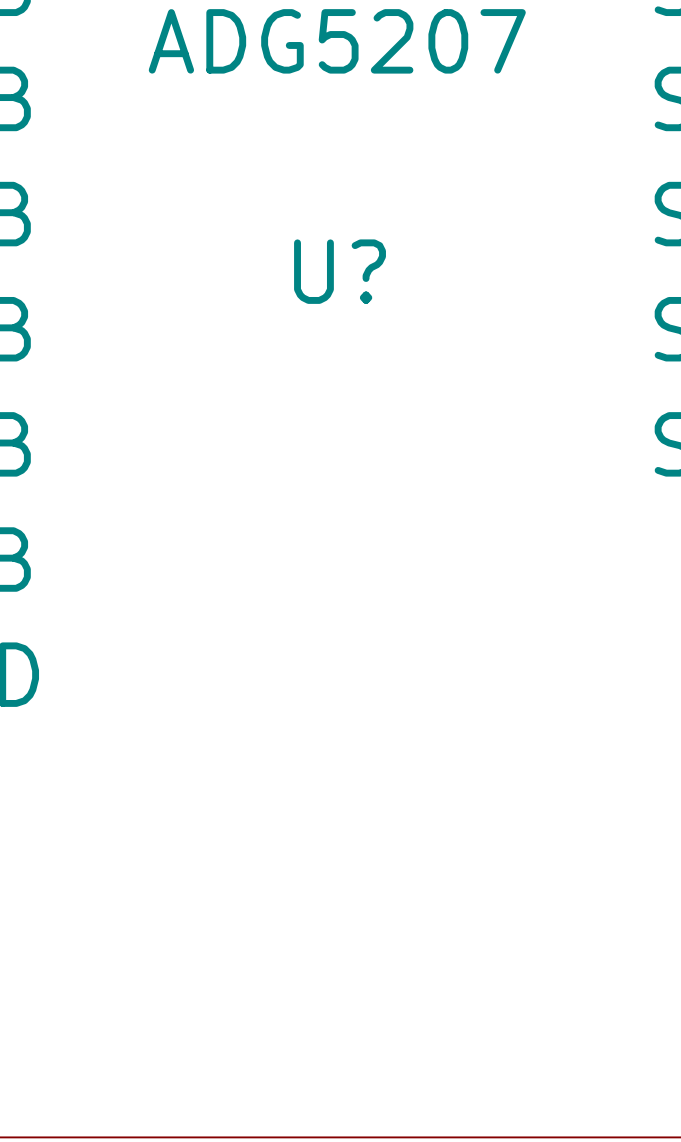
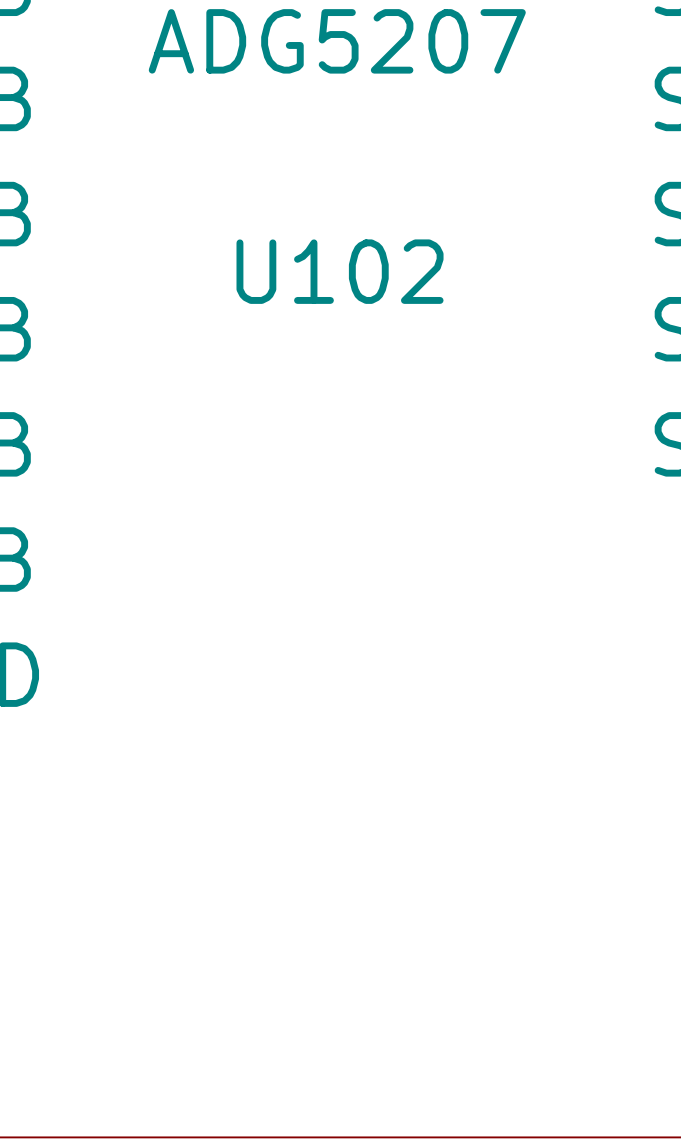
U? name: U? (340, 271) -> U102 (340, 271)

